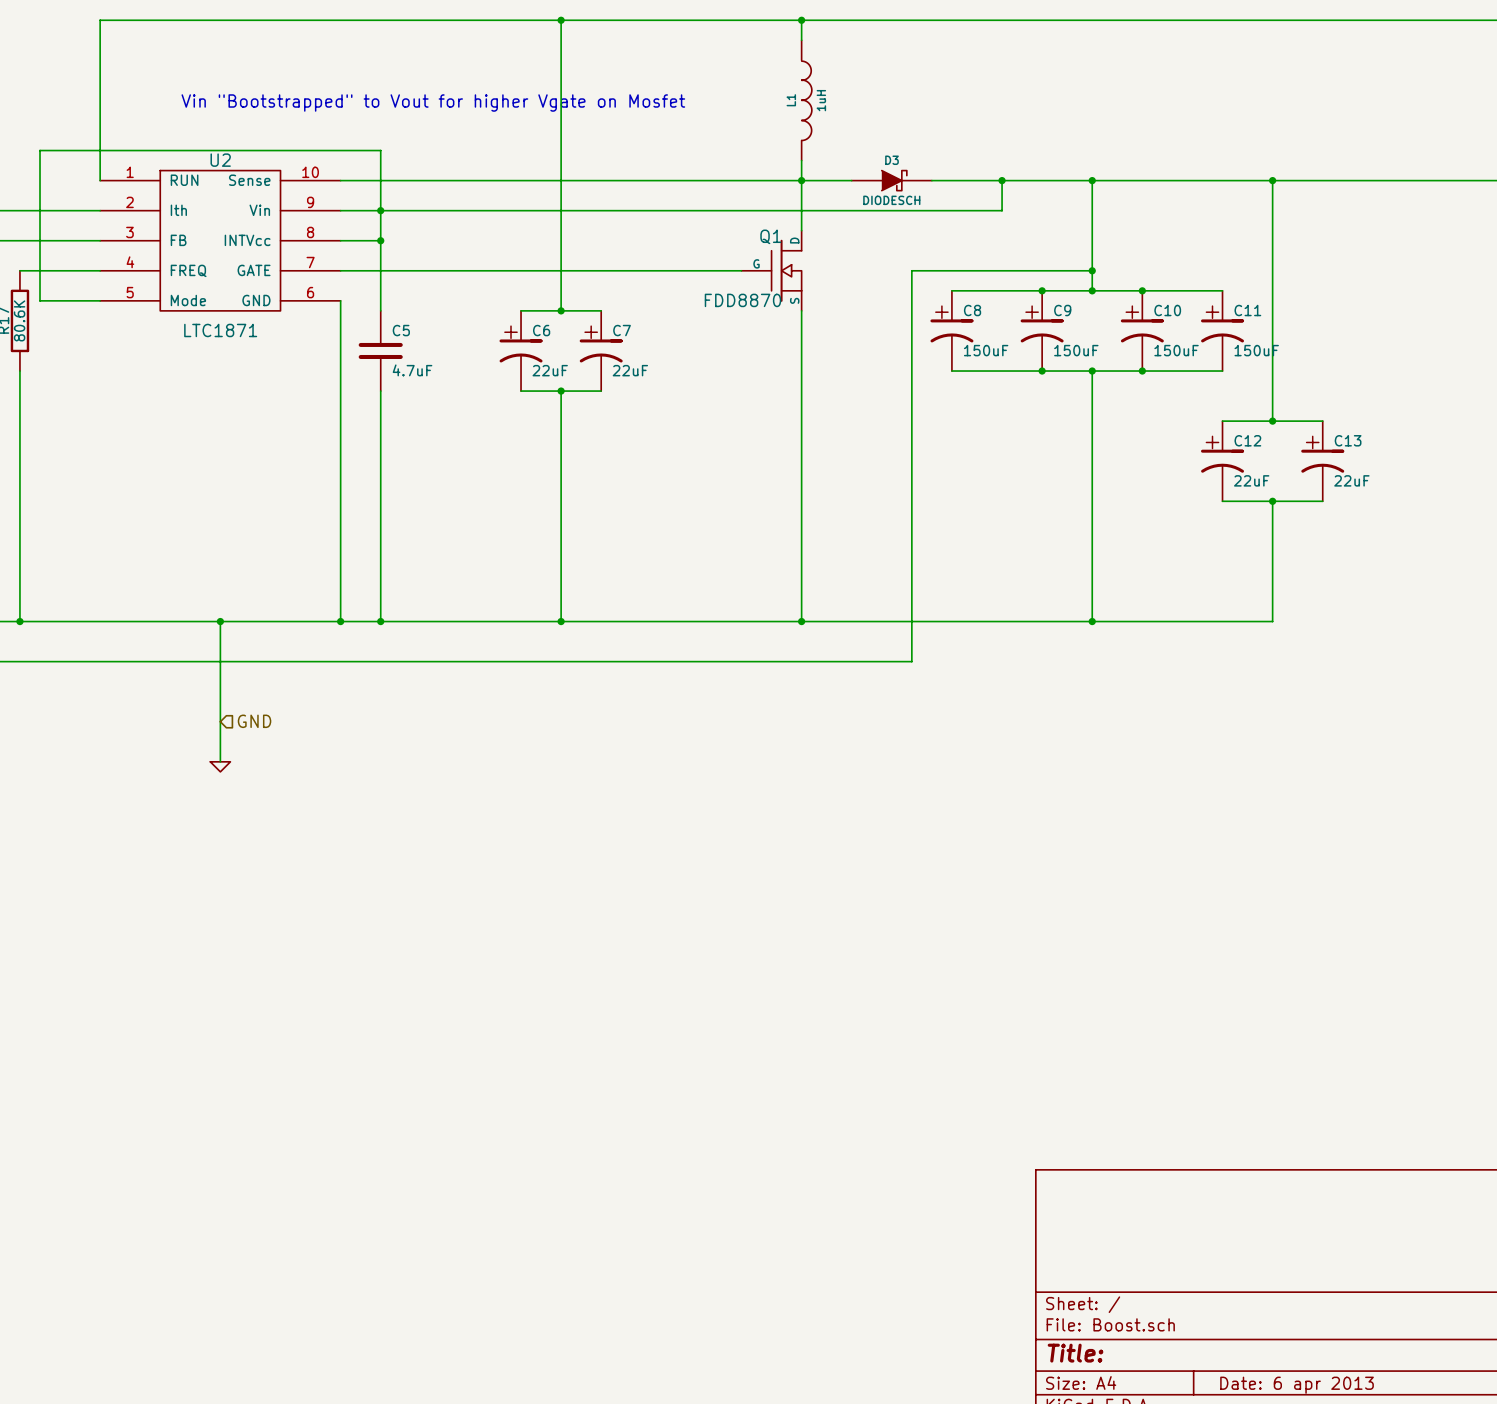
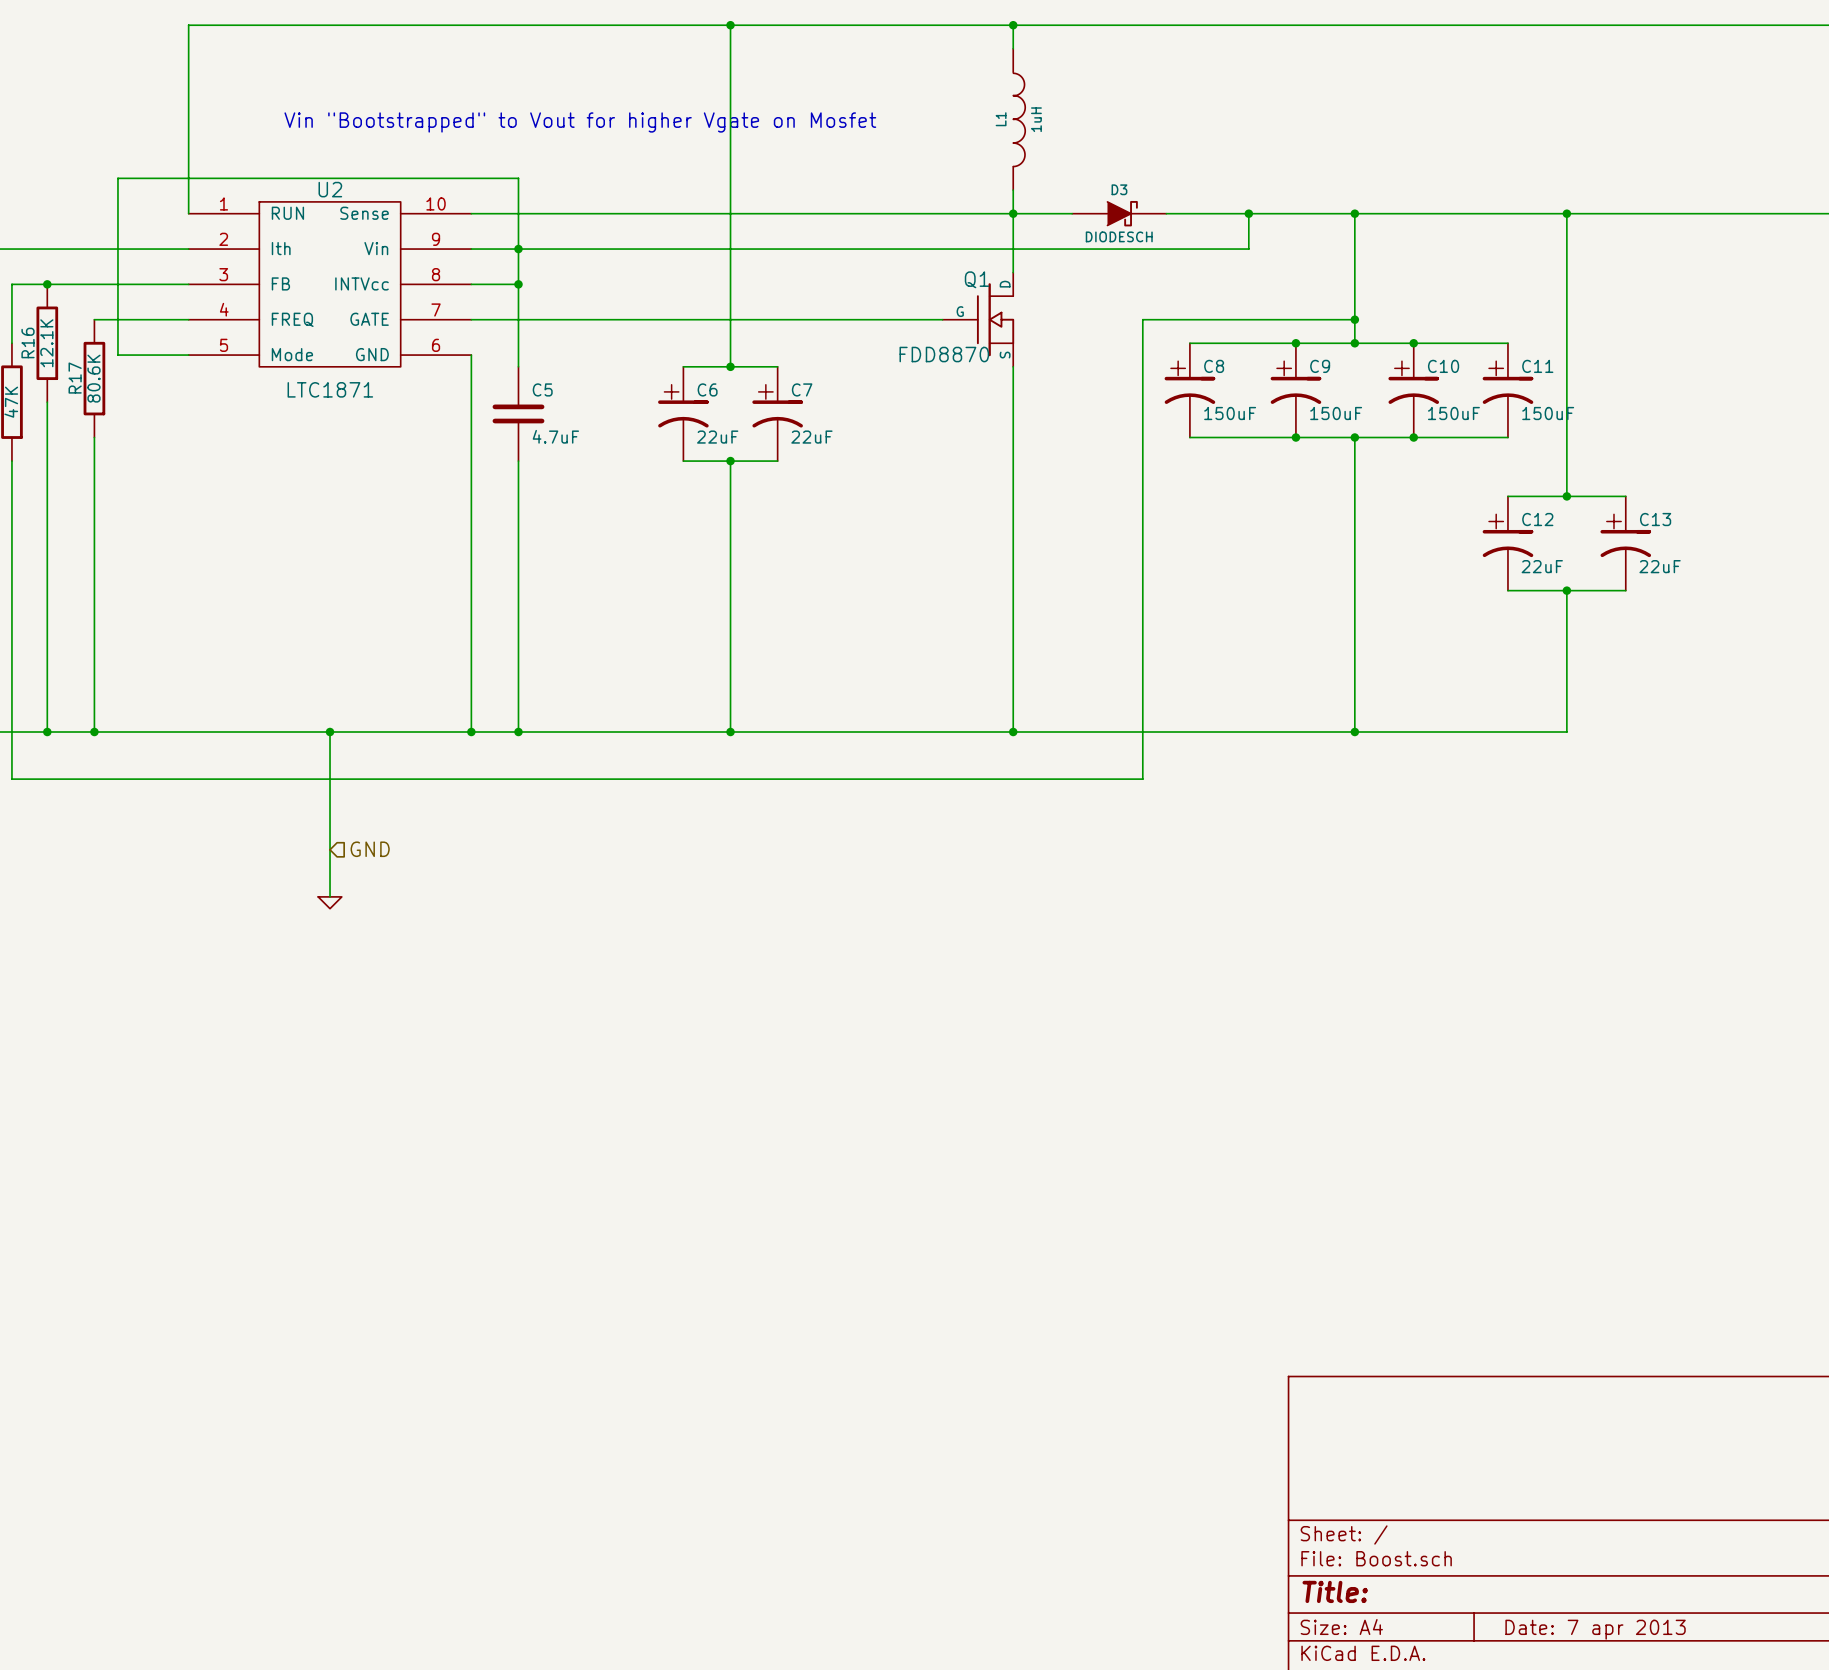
title block: Date: 6 apr 2013 (1297, 1385) -> Date: 7 apr 2013 (1595, 1629)

